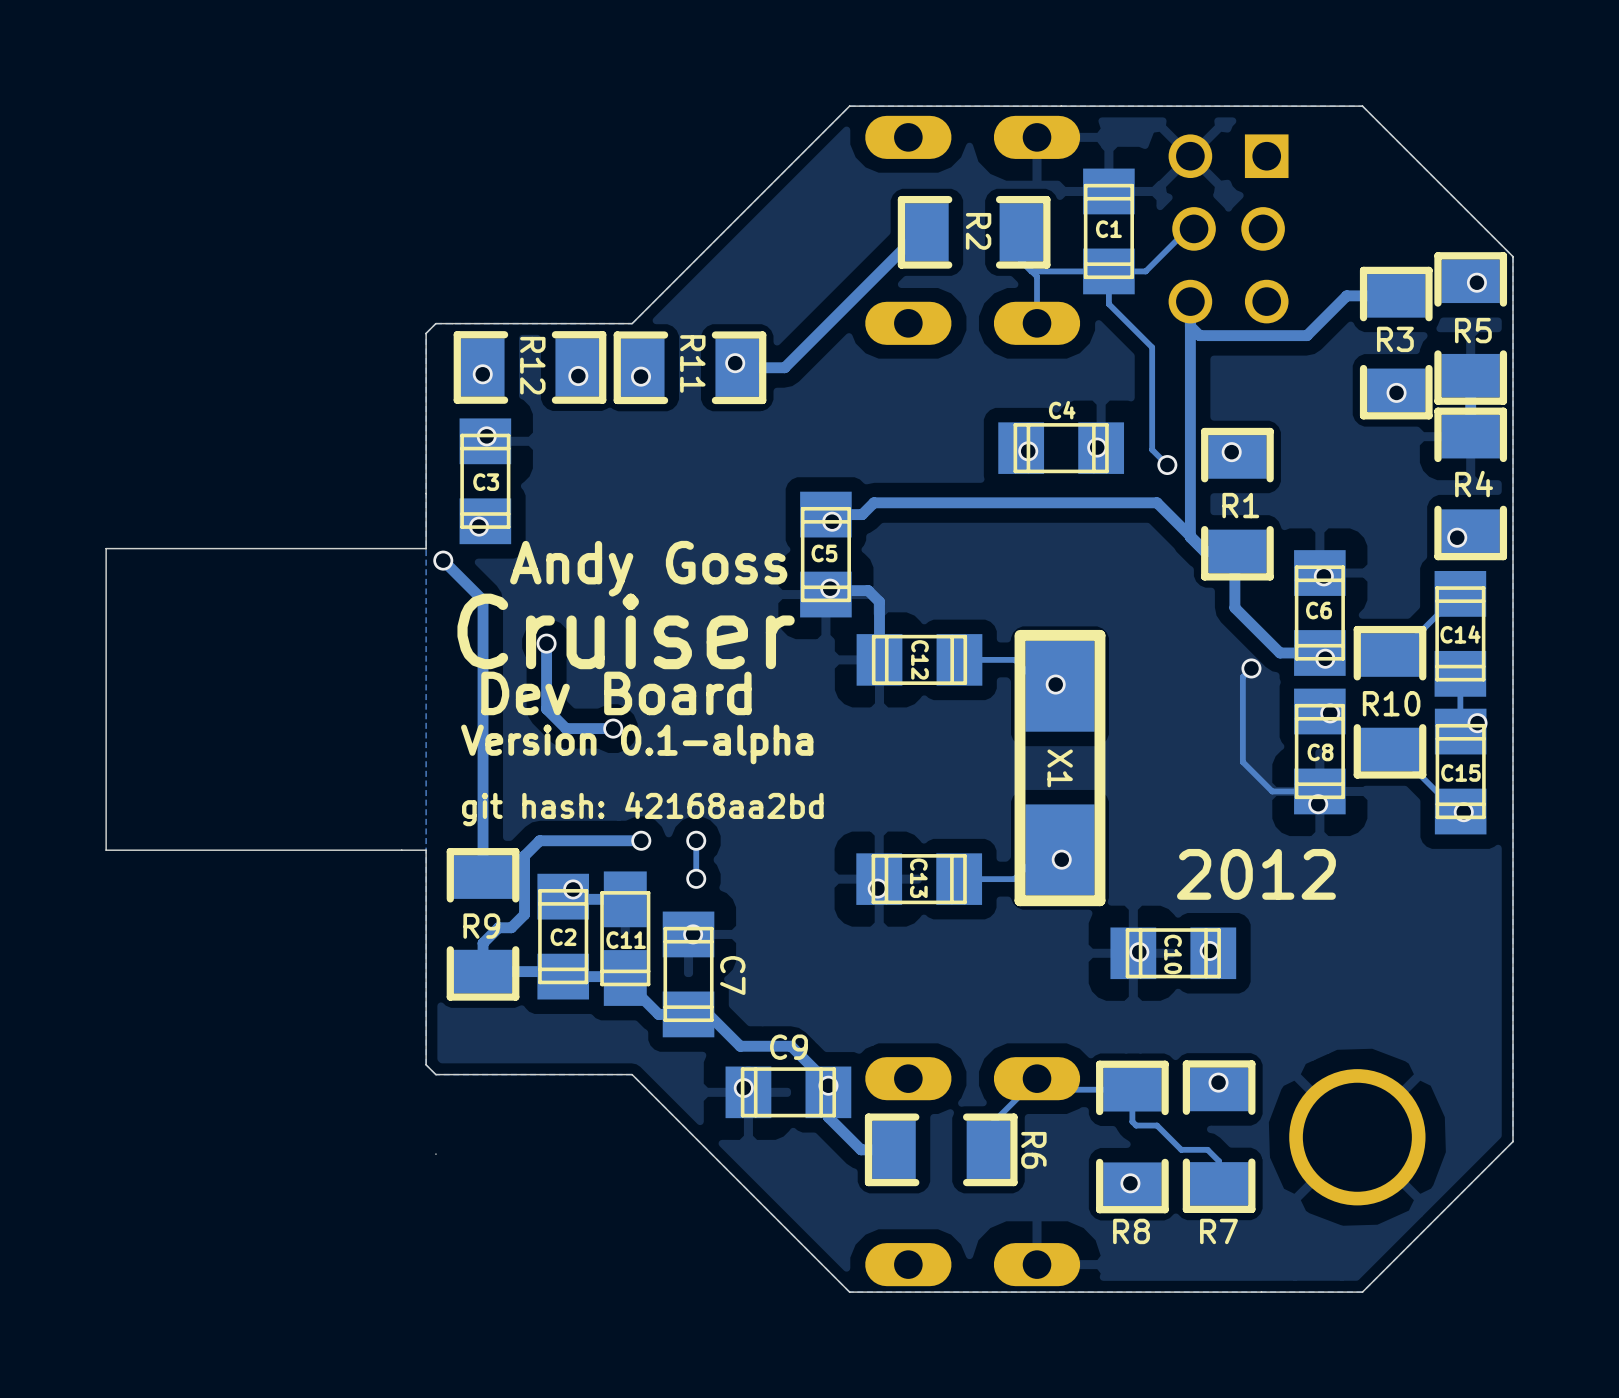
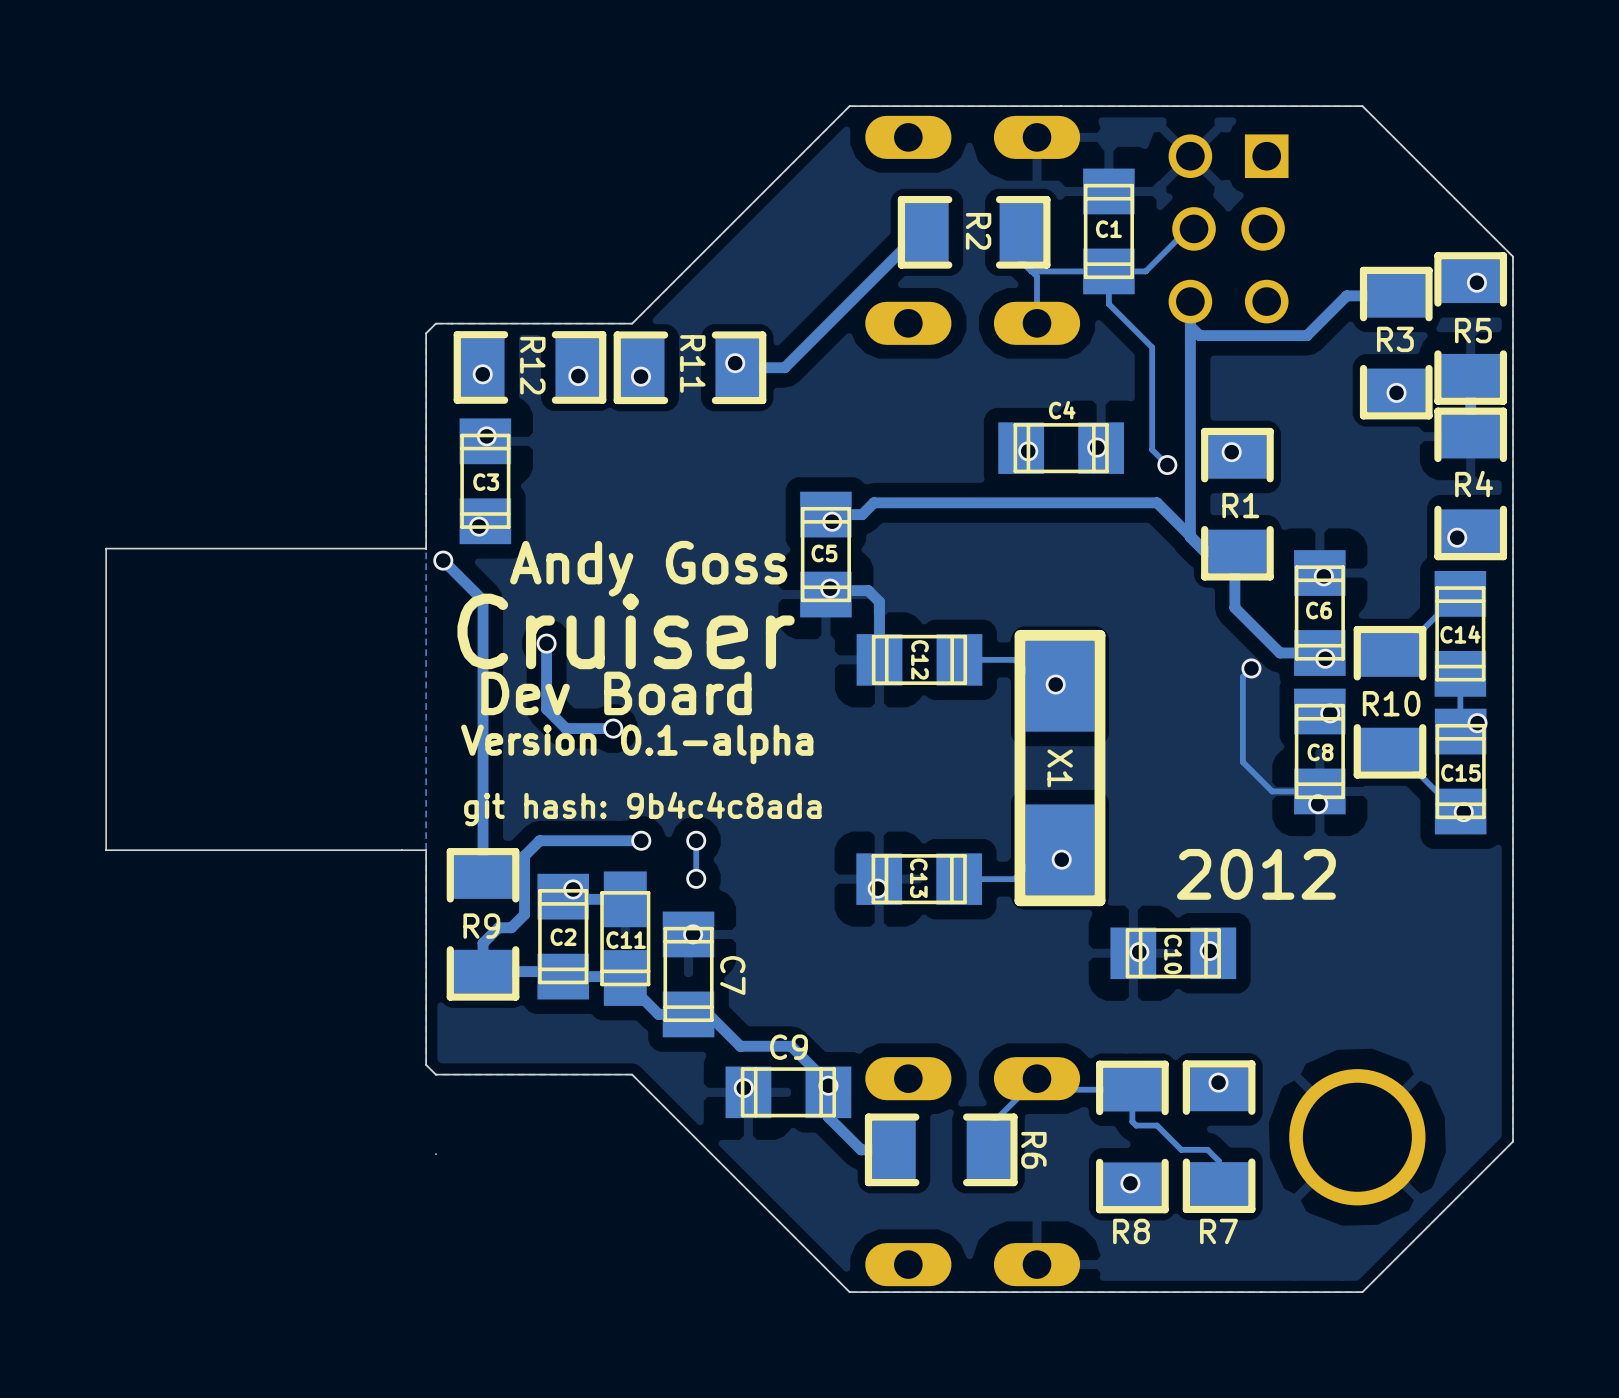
text: git hash: 42168aa2bd (642, 809) -> git hash: 9b4c4c8ada (642, 809)

